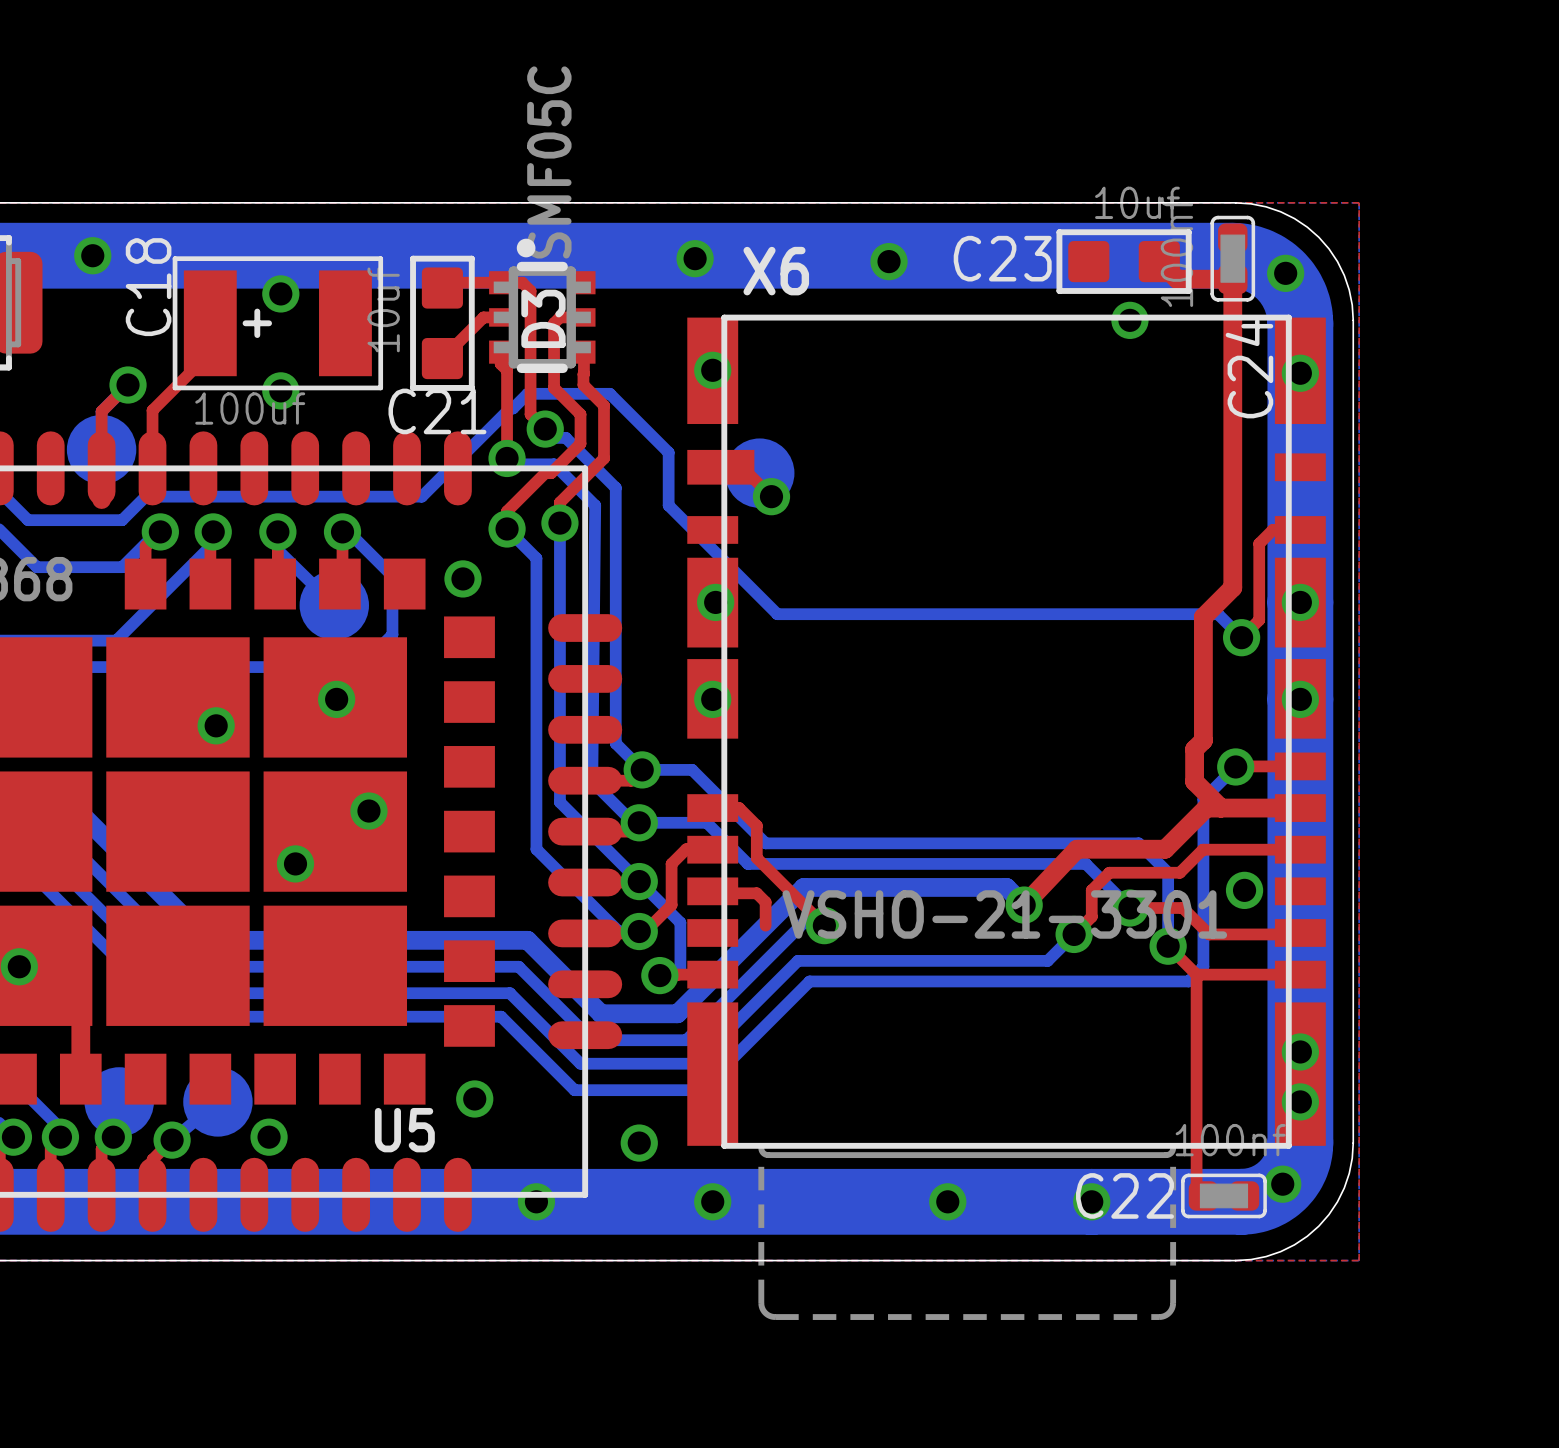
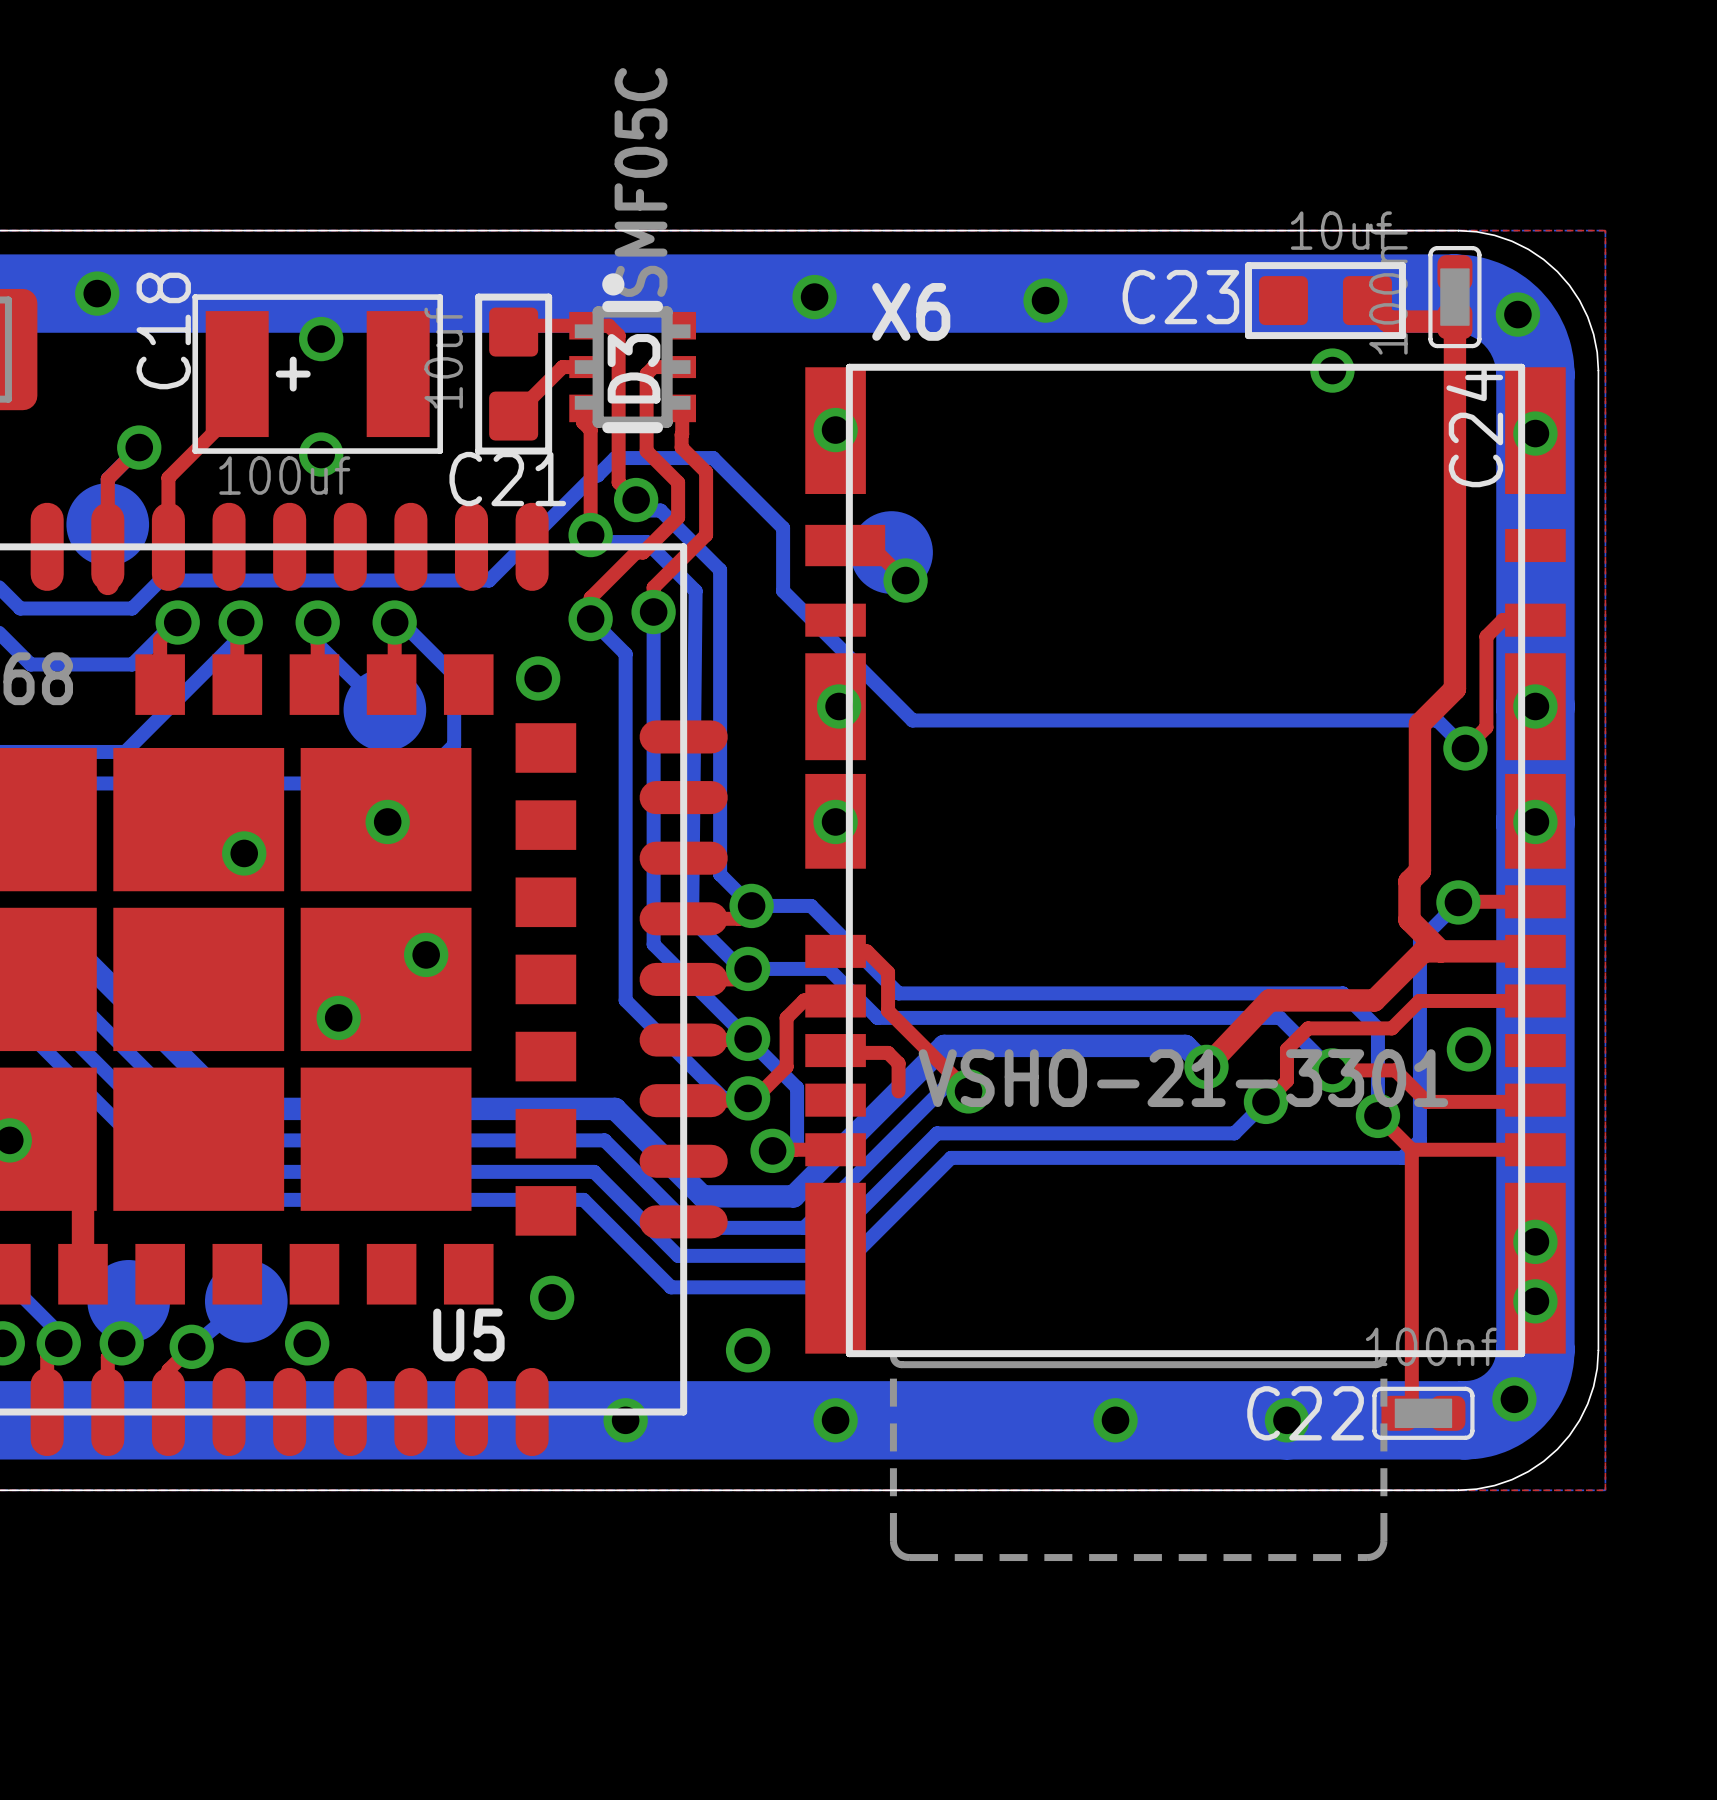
C22 position: (1223, 1195) -> (1423, 1413)

